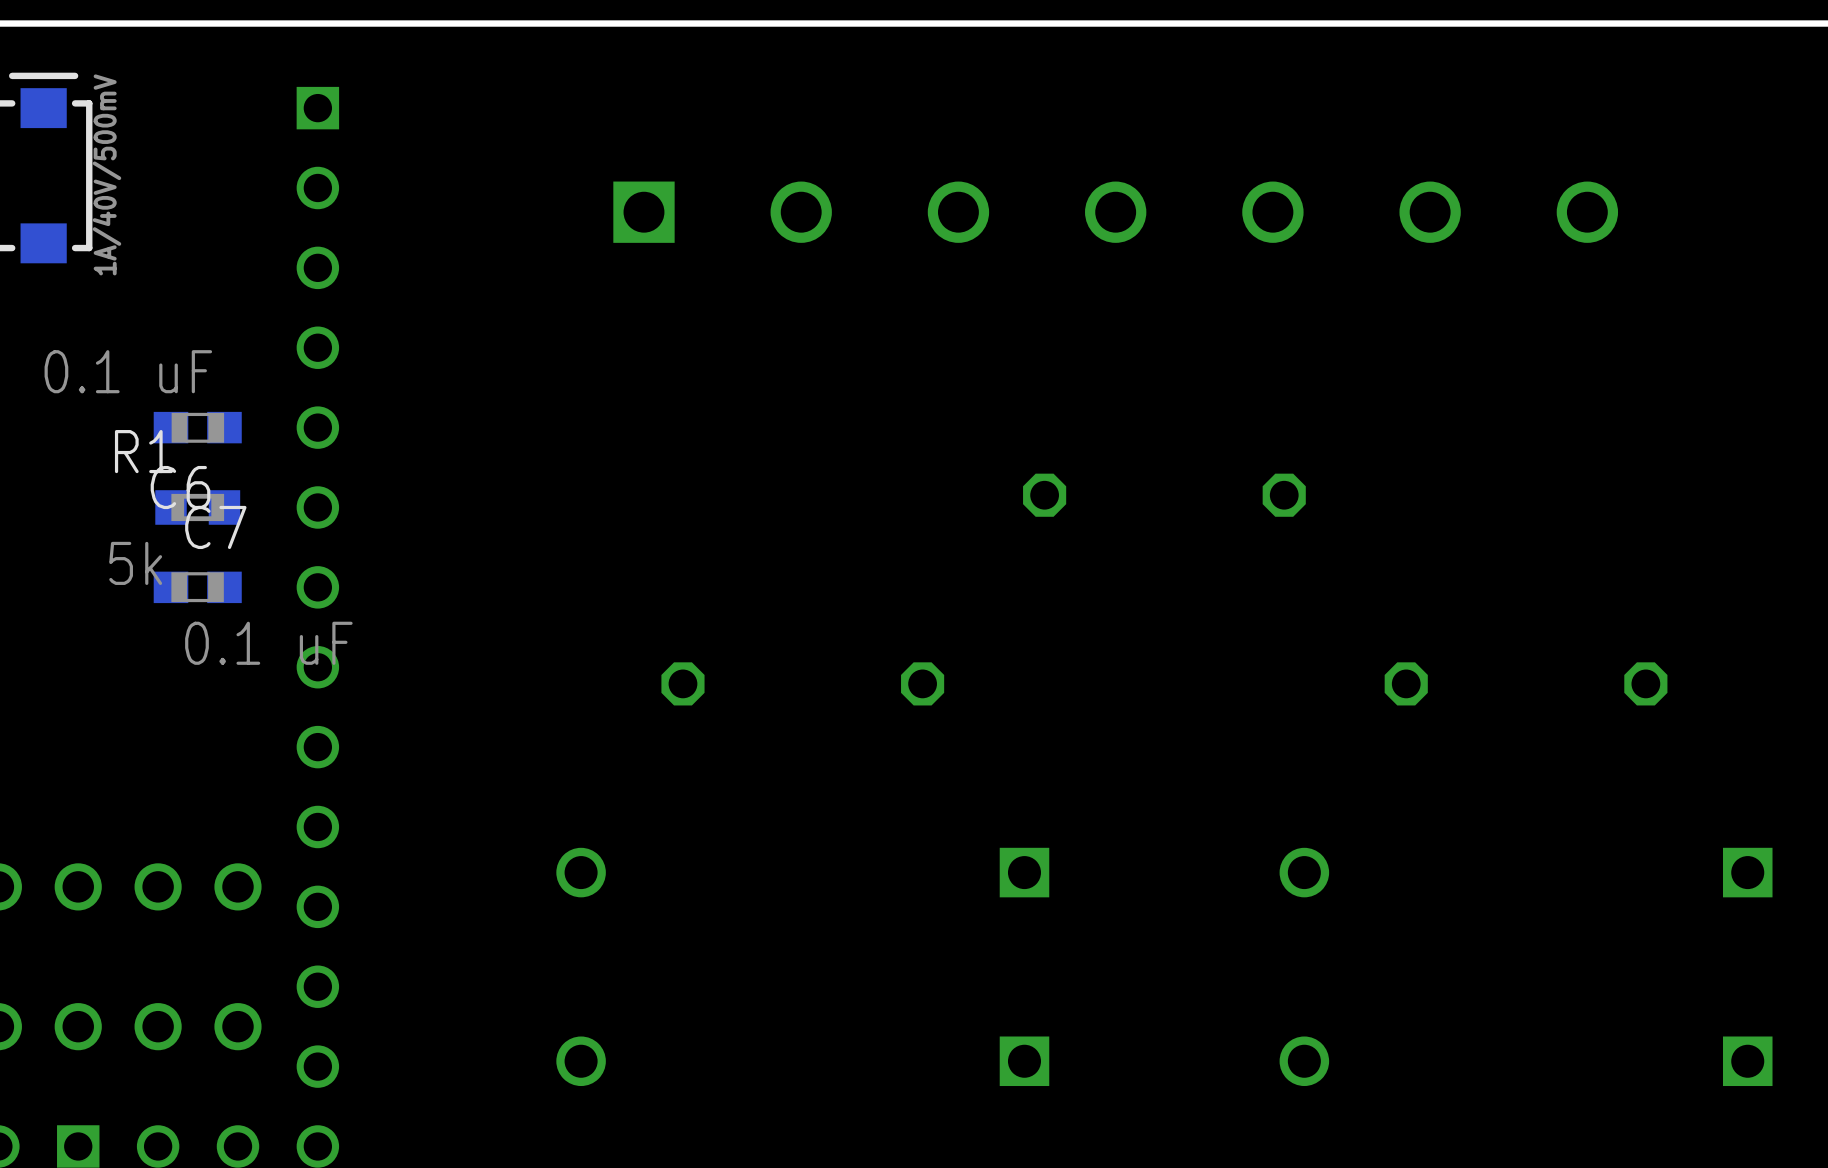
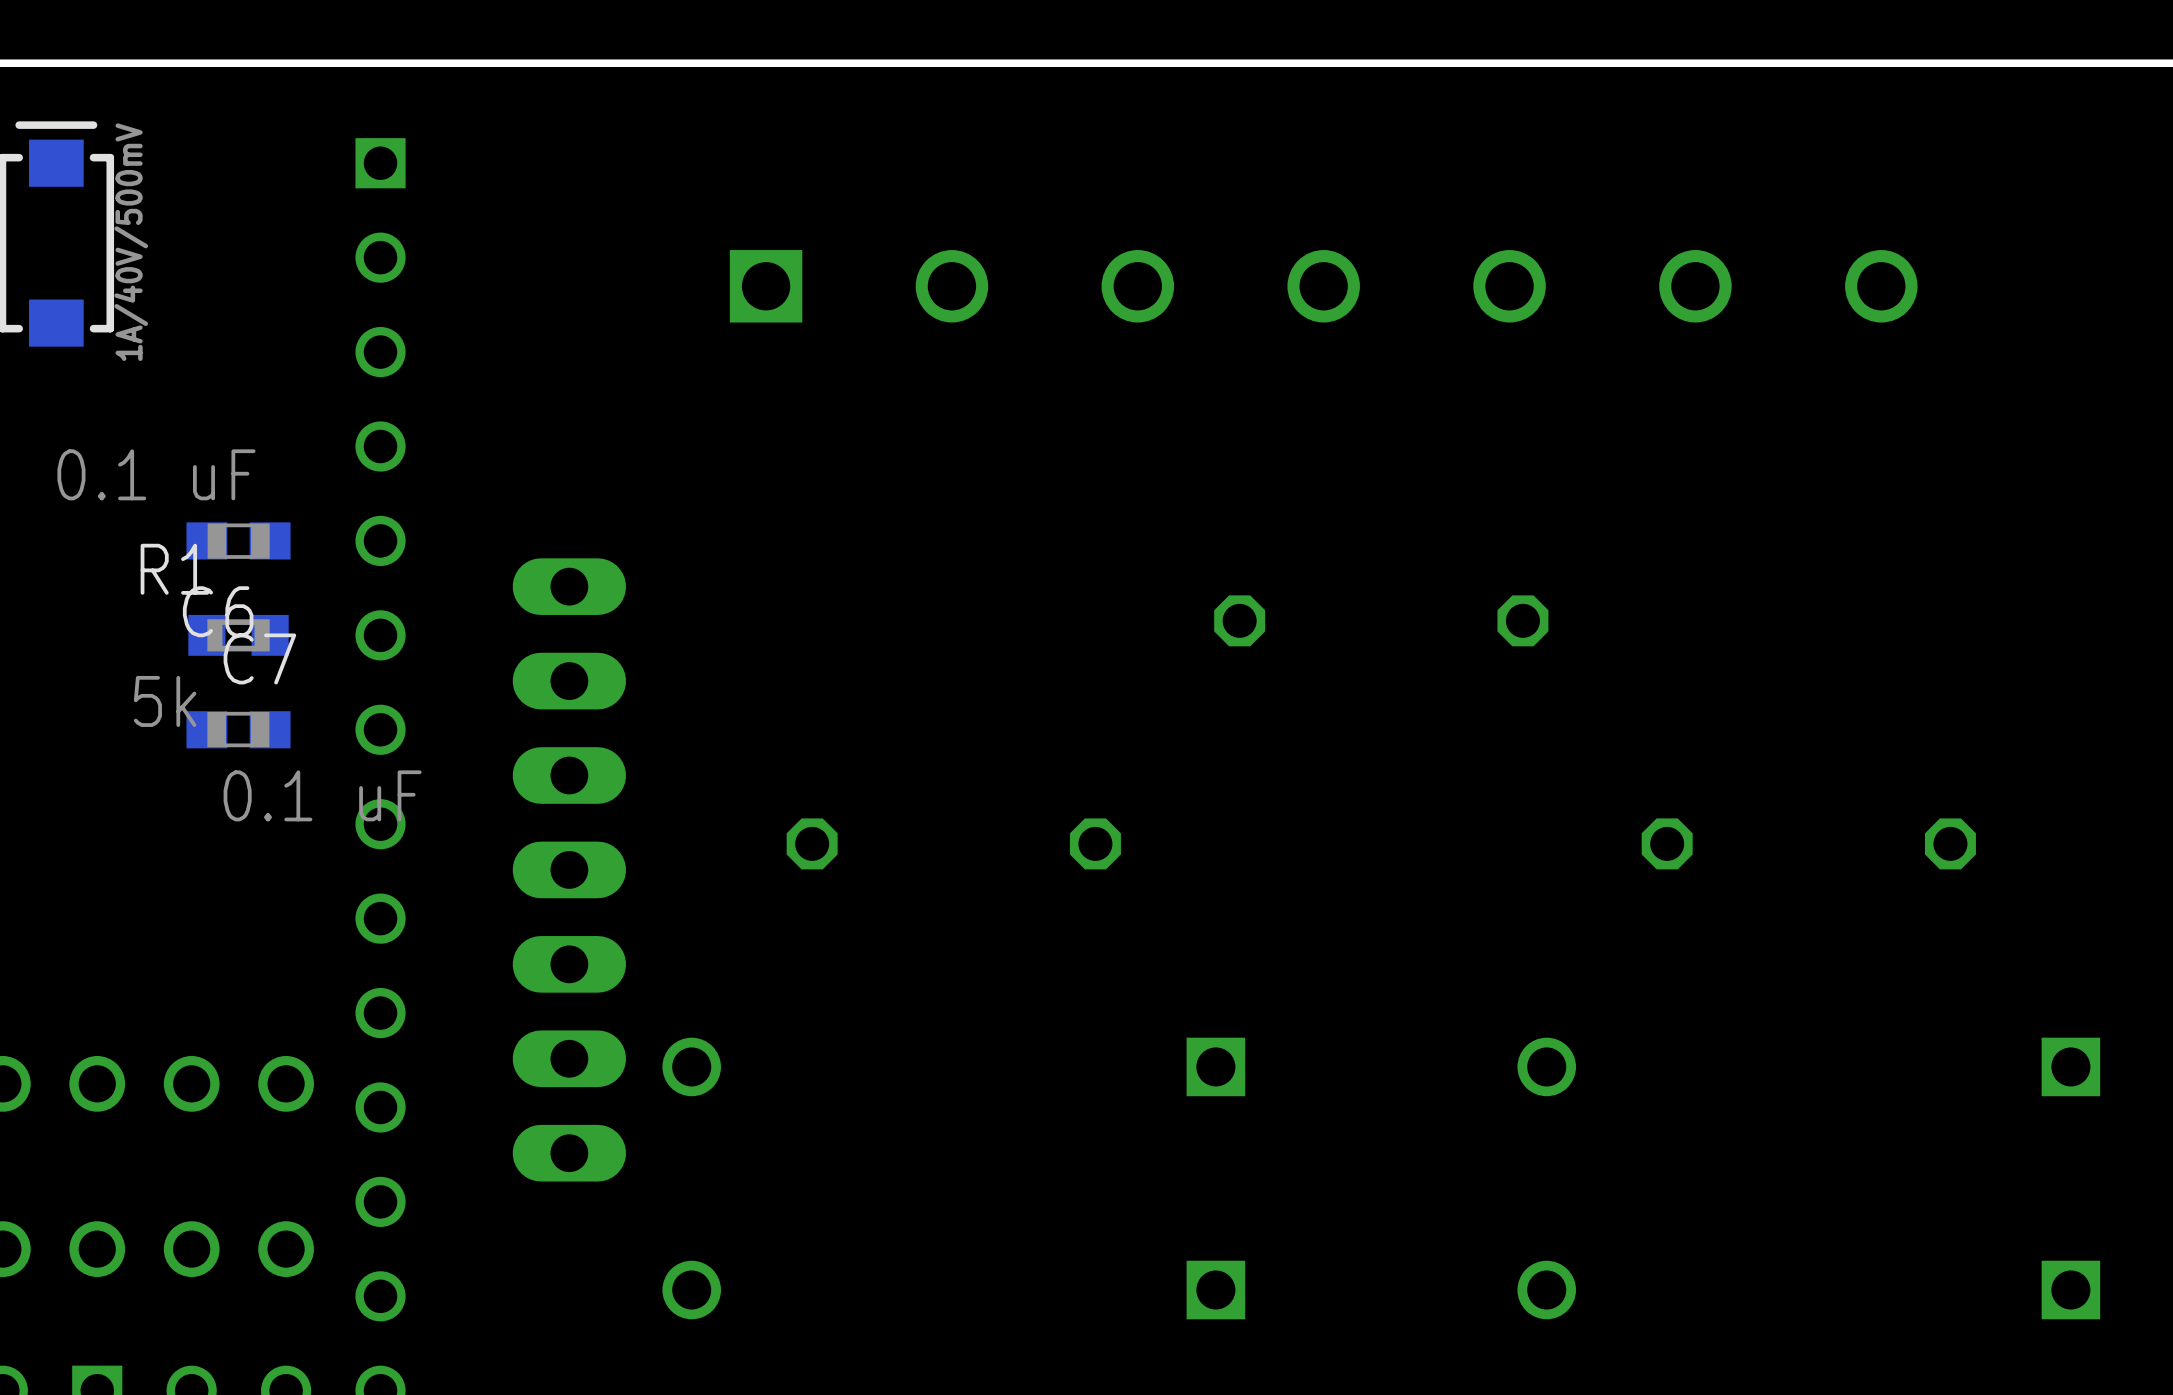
part: none -> (569, 869)

